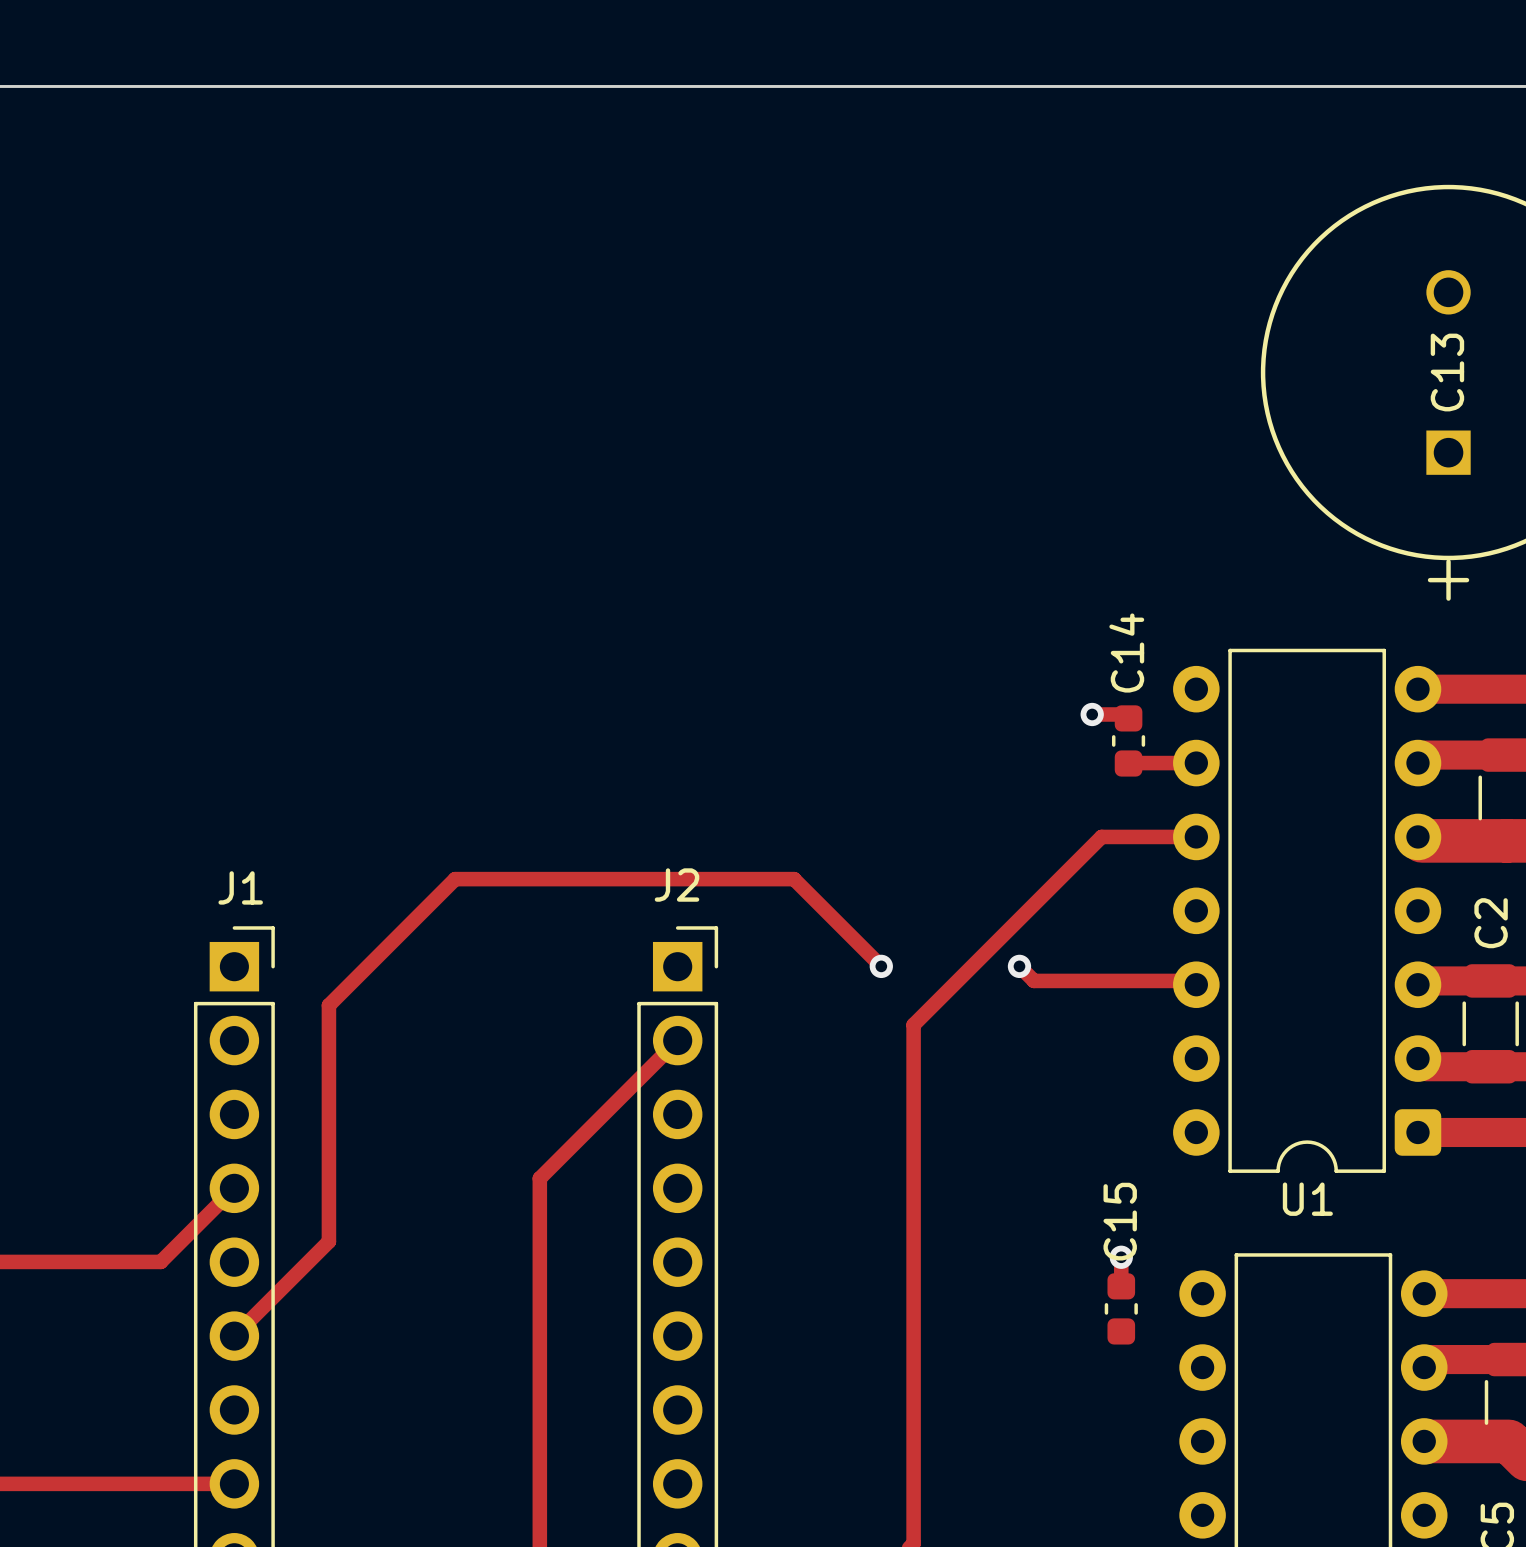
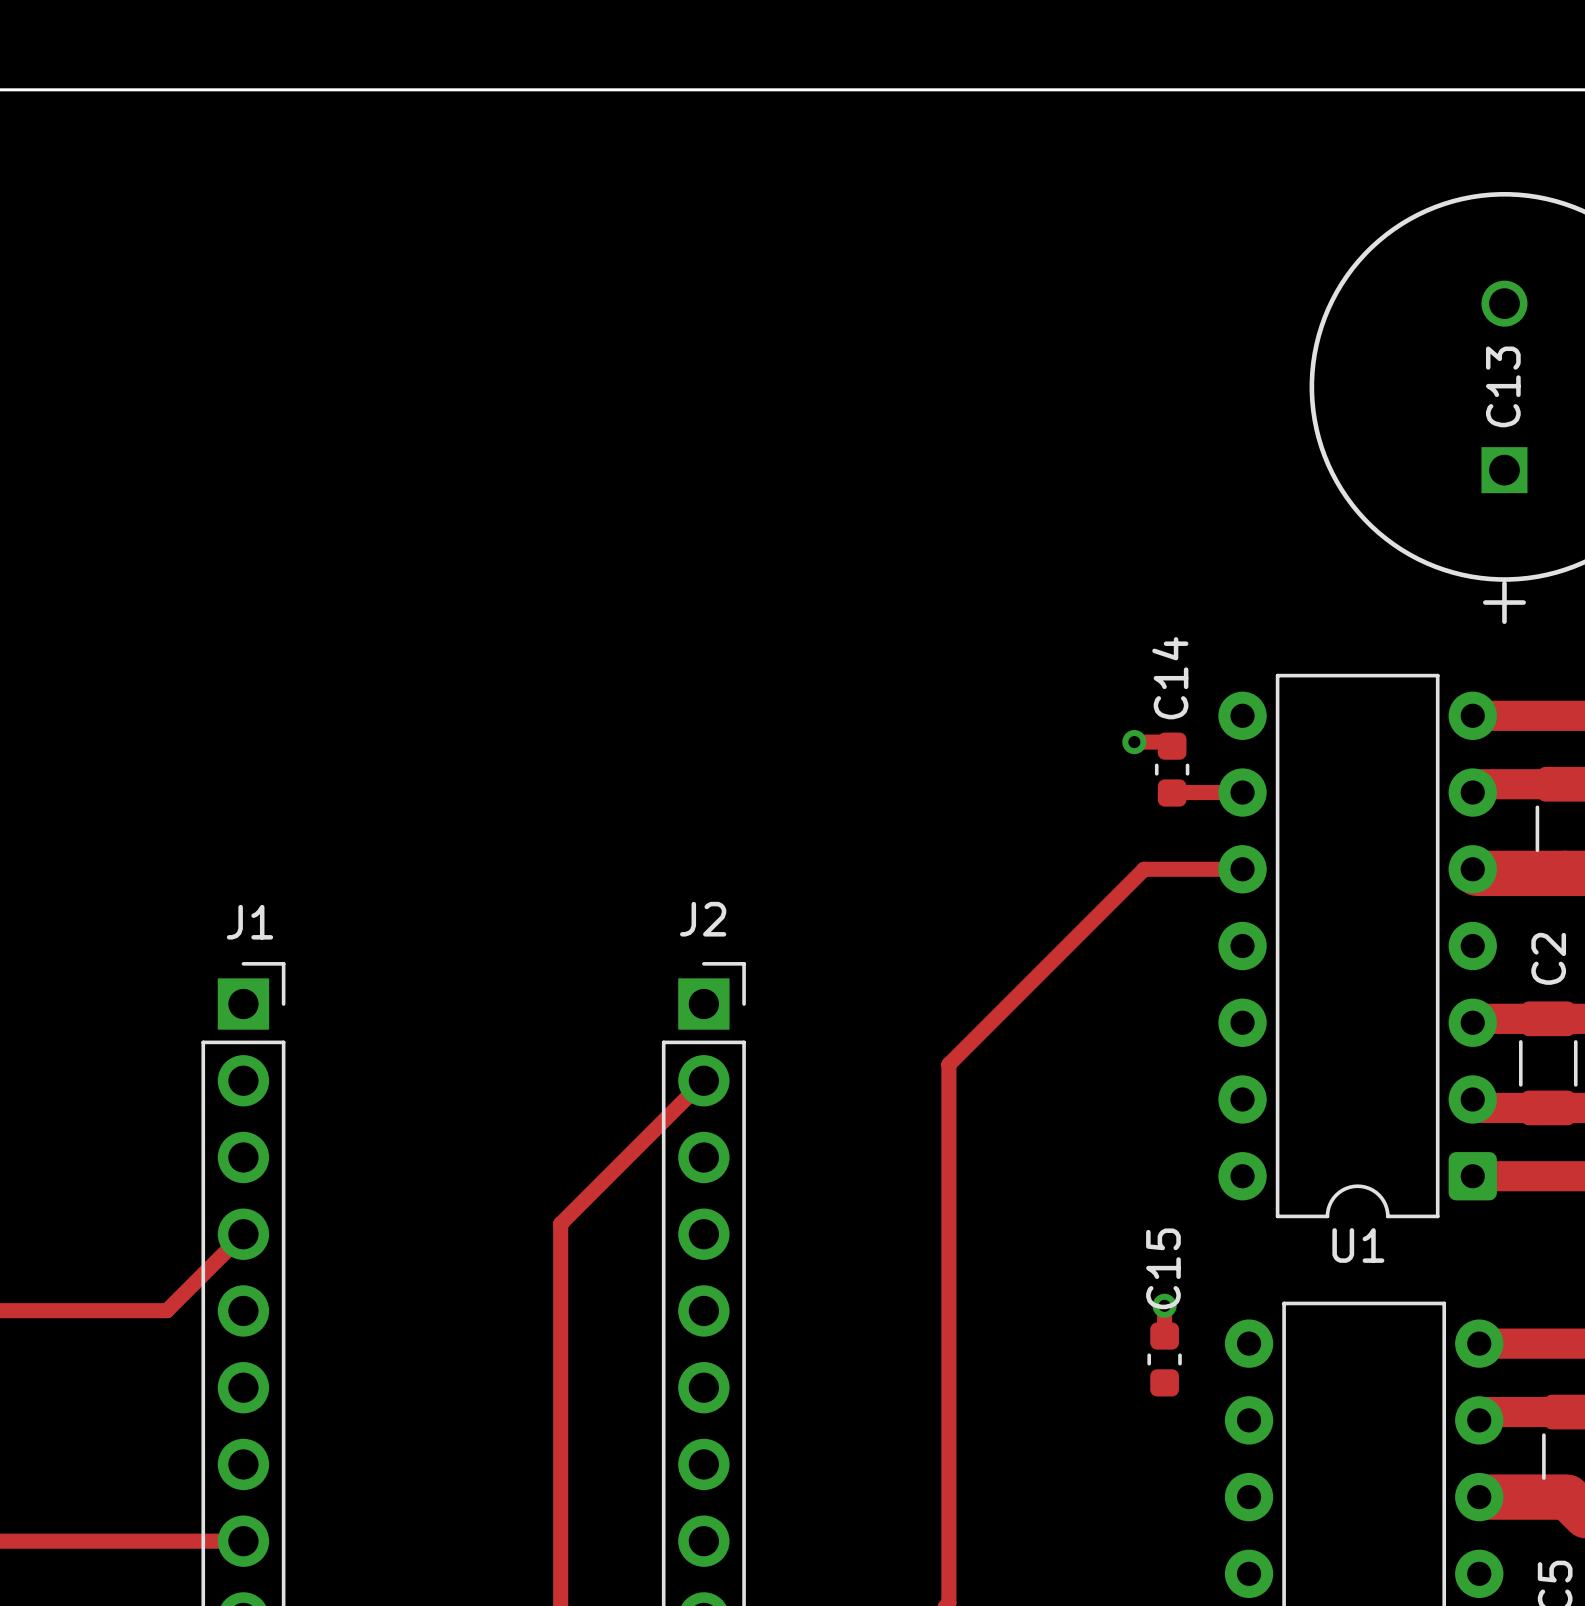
track: (881, 966) (794, 879) (455, 879) (328, 1005) (328, 1241) (234, 1336) -> none
via: (881, 966) -> none
track: (1019, 966) (1034, 980) (1192, 980) -> none
via: (1019, 966) -> none

